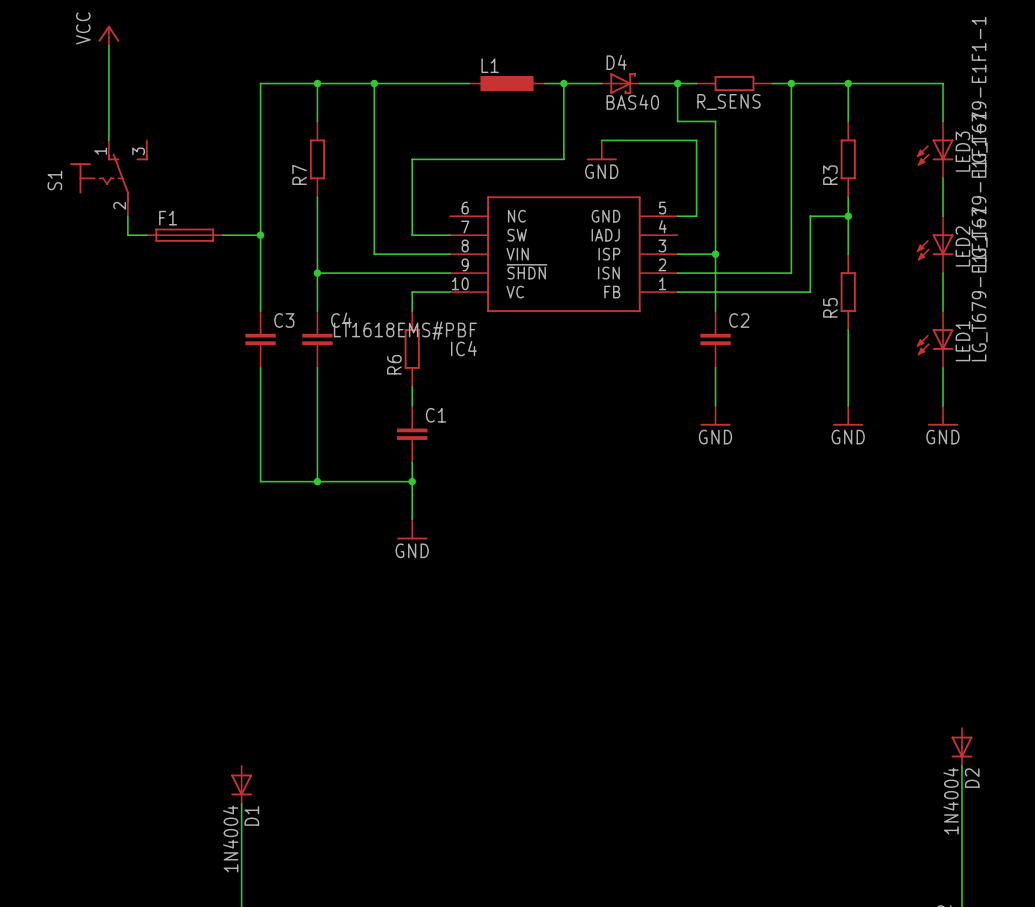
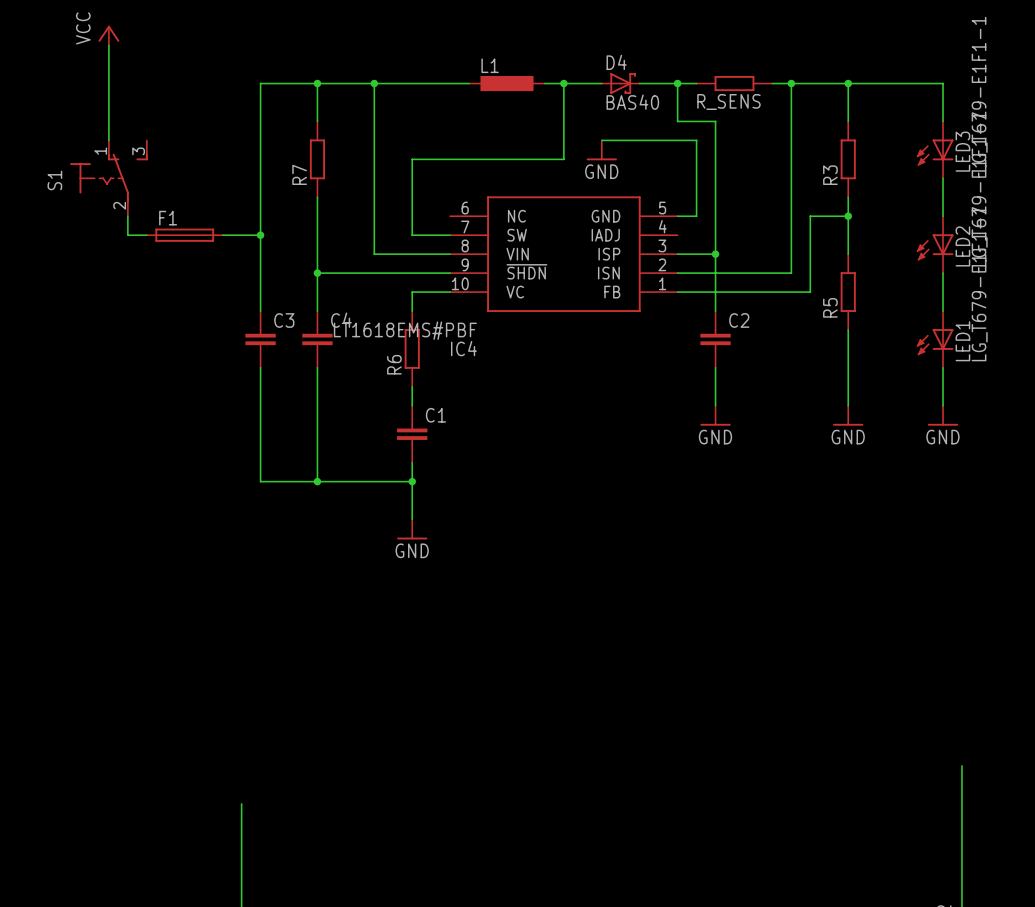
D2: 1N4004 (961, 747) -> none
D1: 1N4004 (241, 784) -> none

